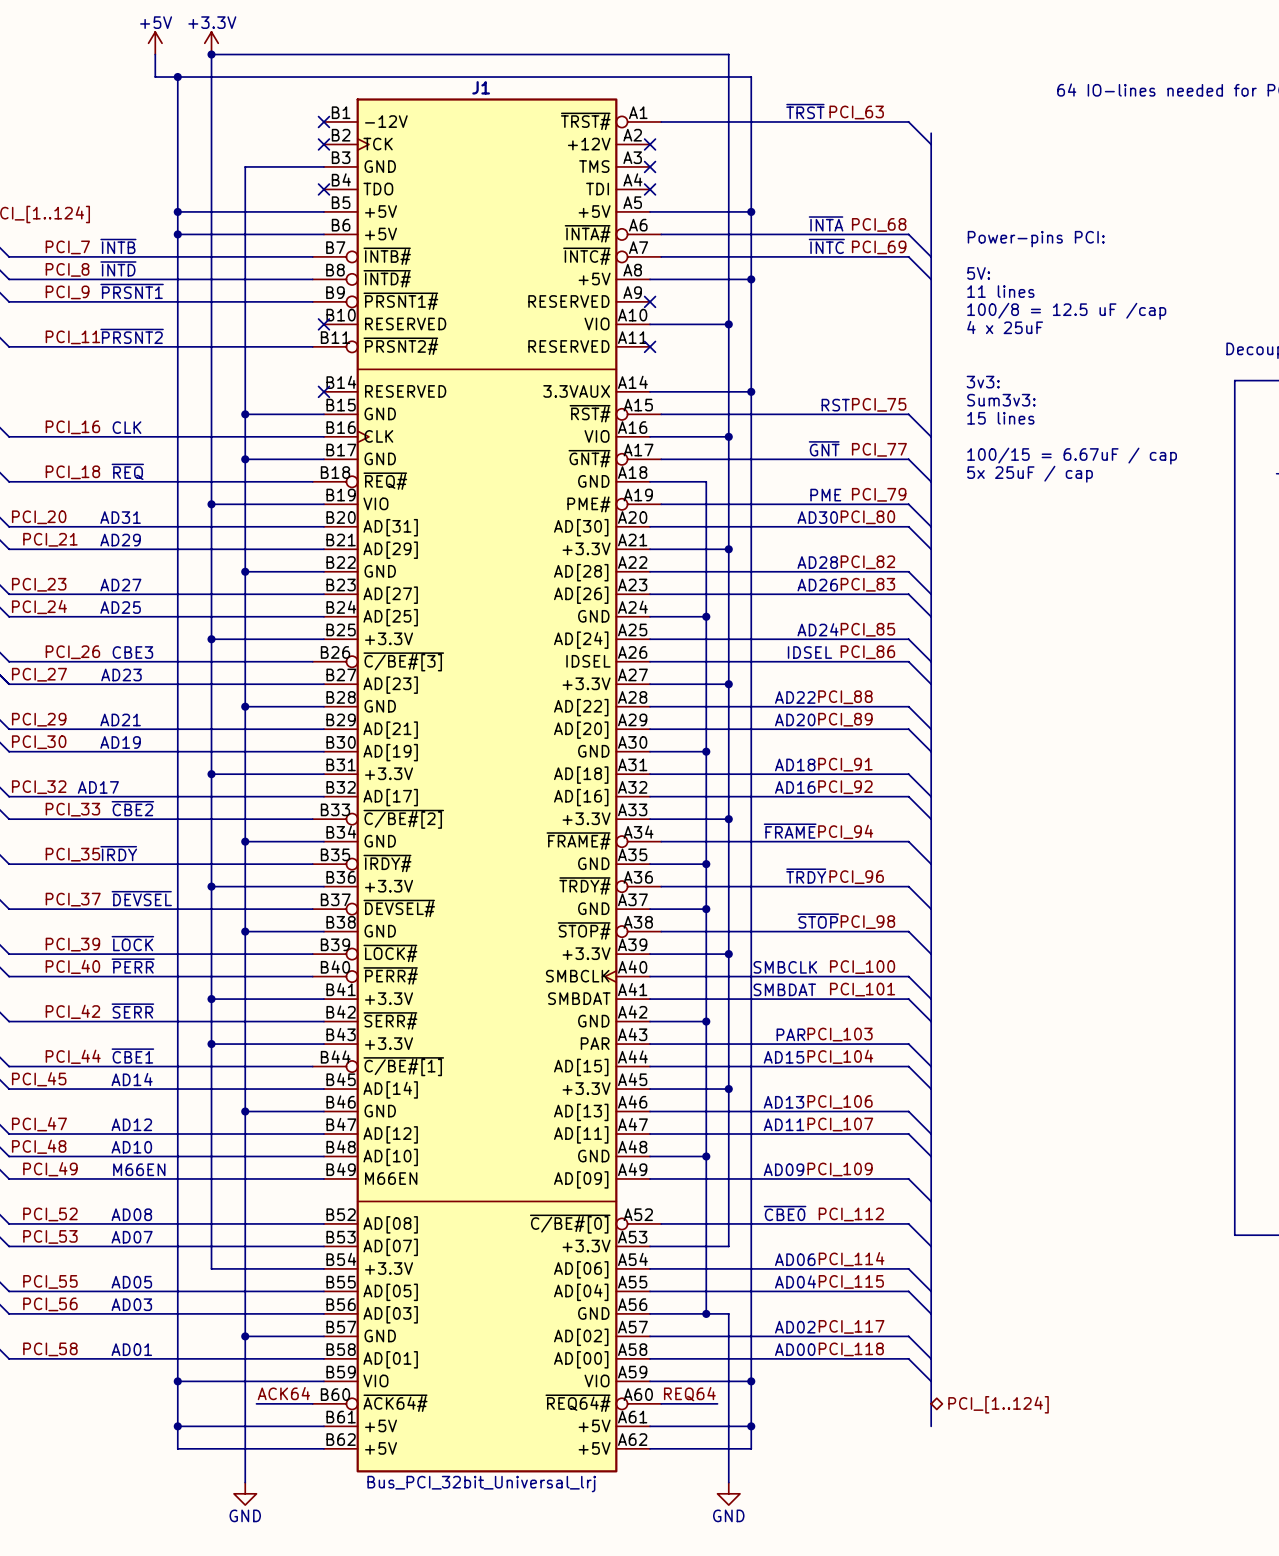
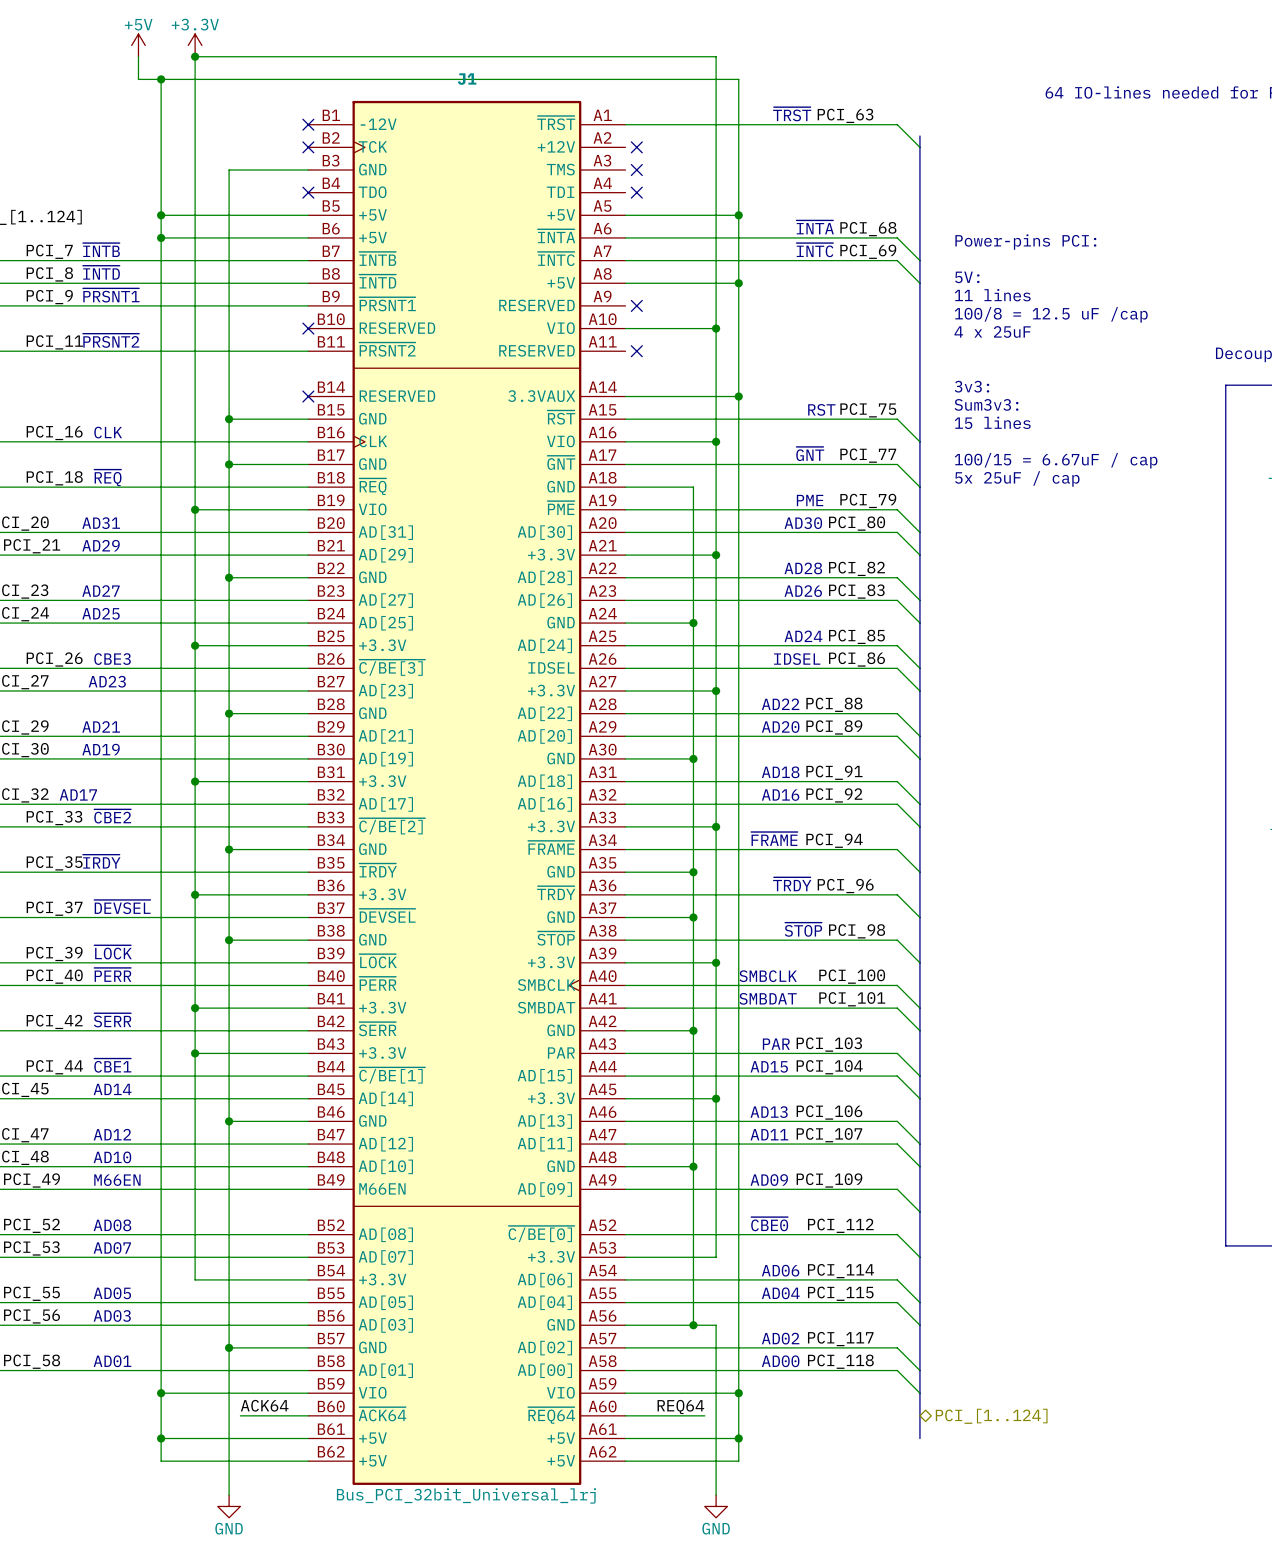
J1 symbol: [312, 98, 662, 1473] -> [308, 100, 626, 1485]

